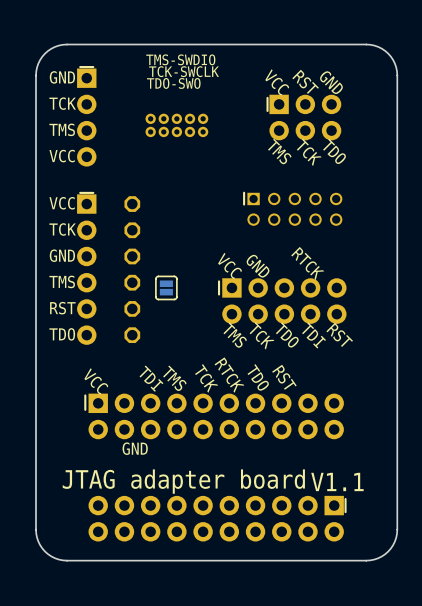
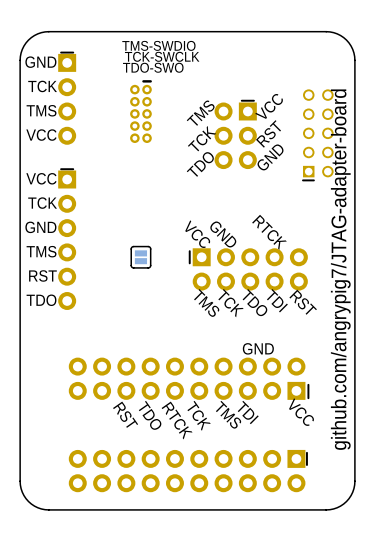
text rotation: 0° (305, 81) -> 90° counterclockwise (268, 133)
text position: RST (305, 81) -> RST (268, 133)
text rotation: 0° (277, 82) -> 90° counterclockwise (269, 106)
text position: VCC (277, 82) -> VCC (269, 106)
text rotation: 0° (331, 82) -> 90° counterclockwise (270, 157)
text position: GND (331, 82) -> GND (270, 157)
part rotation: 0° (303, 117) -> 90° clockwise (235, 134)
part position: (303, 117) -> (235, 134)
part: (176, 125) -> none
part: none -> (141, 111)
text rotation: 0° (279, 151) -> 90° counterclockwise (200, 113)
text position: TMS (279, 151) -> TMS (200, 113)
text rotation: 0° (334, 151) -> 90° counterclockwise (200, 164)
text position: TDO (334, 151) -> TDO (200, 164)
text rotation: 0° (309, 152) -> 90° counterclockwise (202, 138)
text position: TCK (309, 152) -> TCK (202, 138)
part rotation: 0° (292, 208) -> 90° counterclockwise (317, 135)
part position: (292, 208) -> (317, 135)
part: (132, 269) -> none
text: none -> github.com/angrypig7/JTAG-adapter-board (340, 269)
text position: RTCK (229, 375) -> RTCK (177, 420)
text position: TDO (258, 377) -> TDO (150, 415)
text: RST (284, 377) -> none
text position: TDI (151, 378) -> TDI (248, 412)
text position: TMS (174, 378) -> TMS (228, 414)
text position: TCK (206, 378) -> TCK (199, 415)
text: VCC (96, 381) -> none
text: none -> GND (258, 348)
part rotation: 0° (214, 416) -> 180° (189, 378)
text: GND (135, 448) -> none
text: none -> VCC (301, 412)
text: none -> RST (125, 414)
text: JTAG adapter board (183, 481) -> none
text: V1.1 (337, 481) -> none

